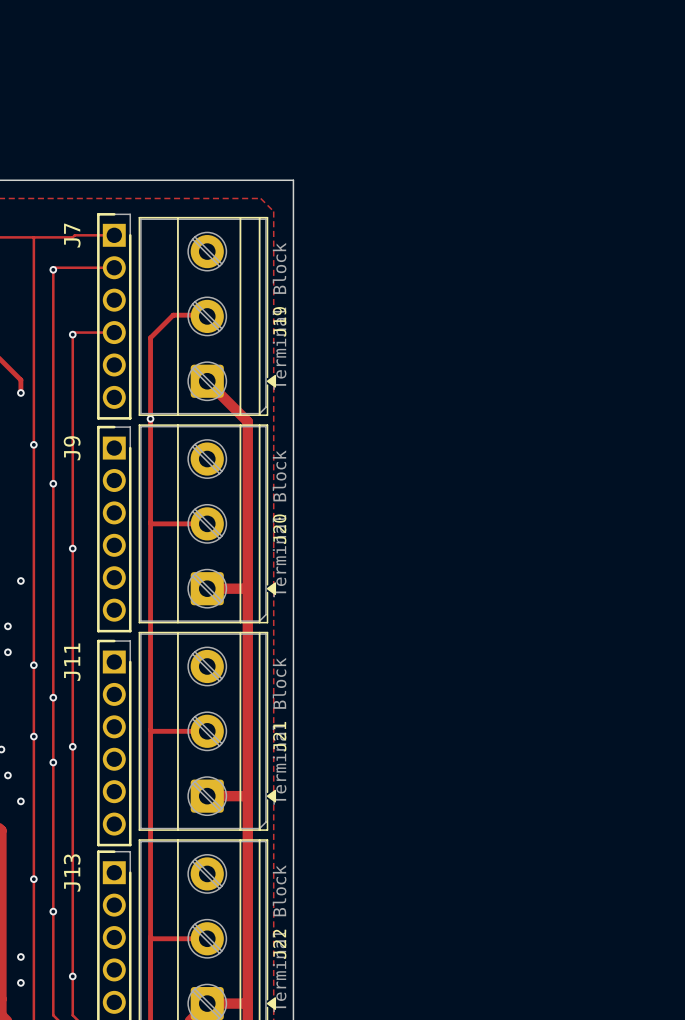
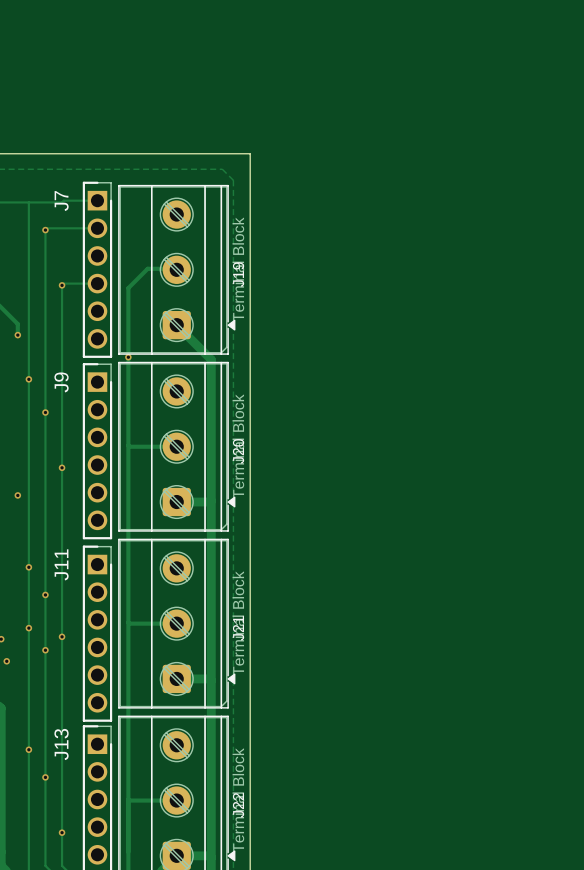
via: (7, 626) -> none
via: (7, 652) -> none
via: (20, 801) -> none
via: (20, 956) -> none
via: (20, 982) -> none

